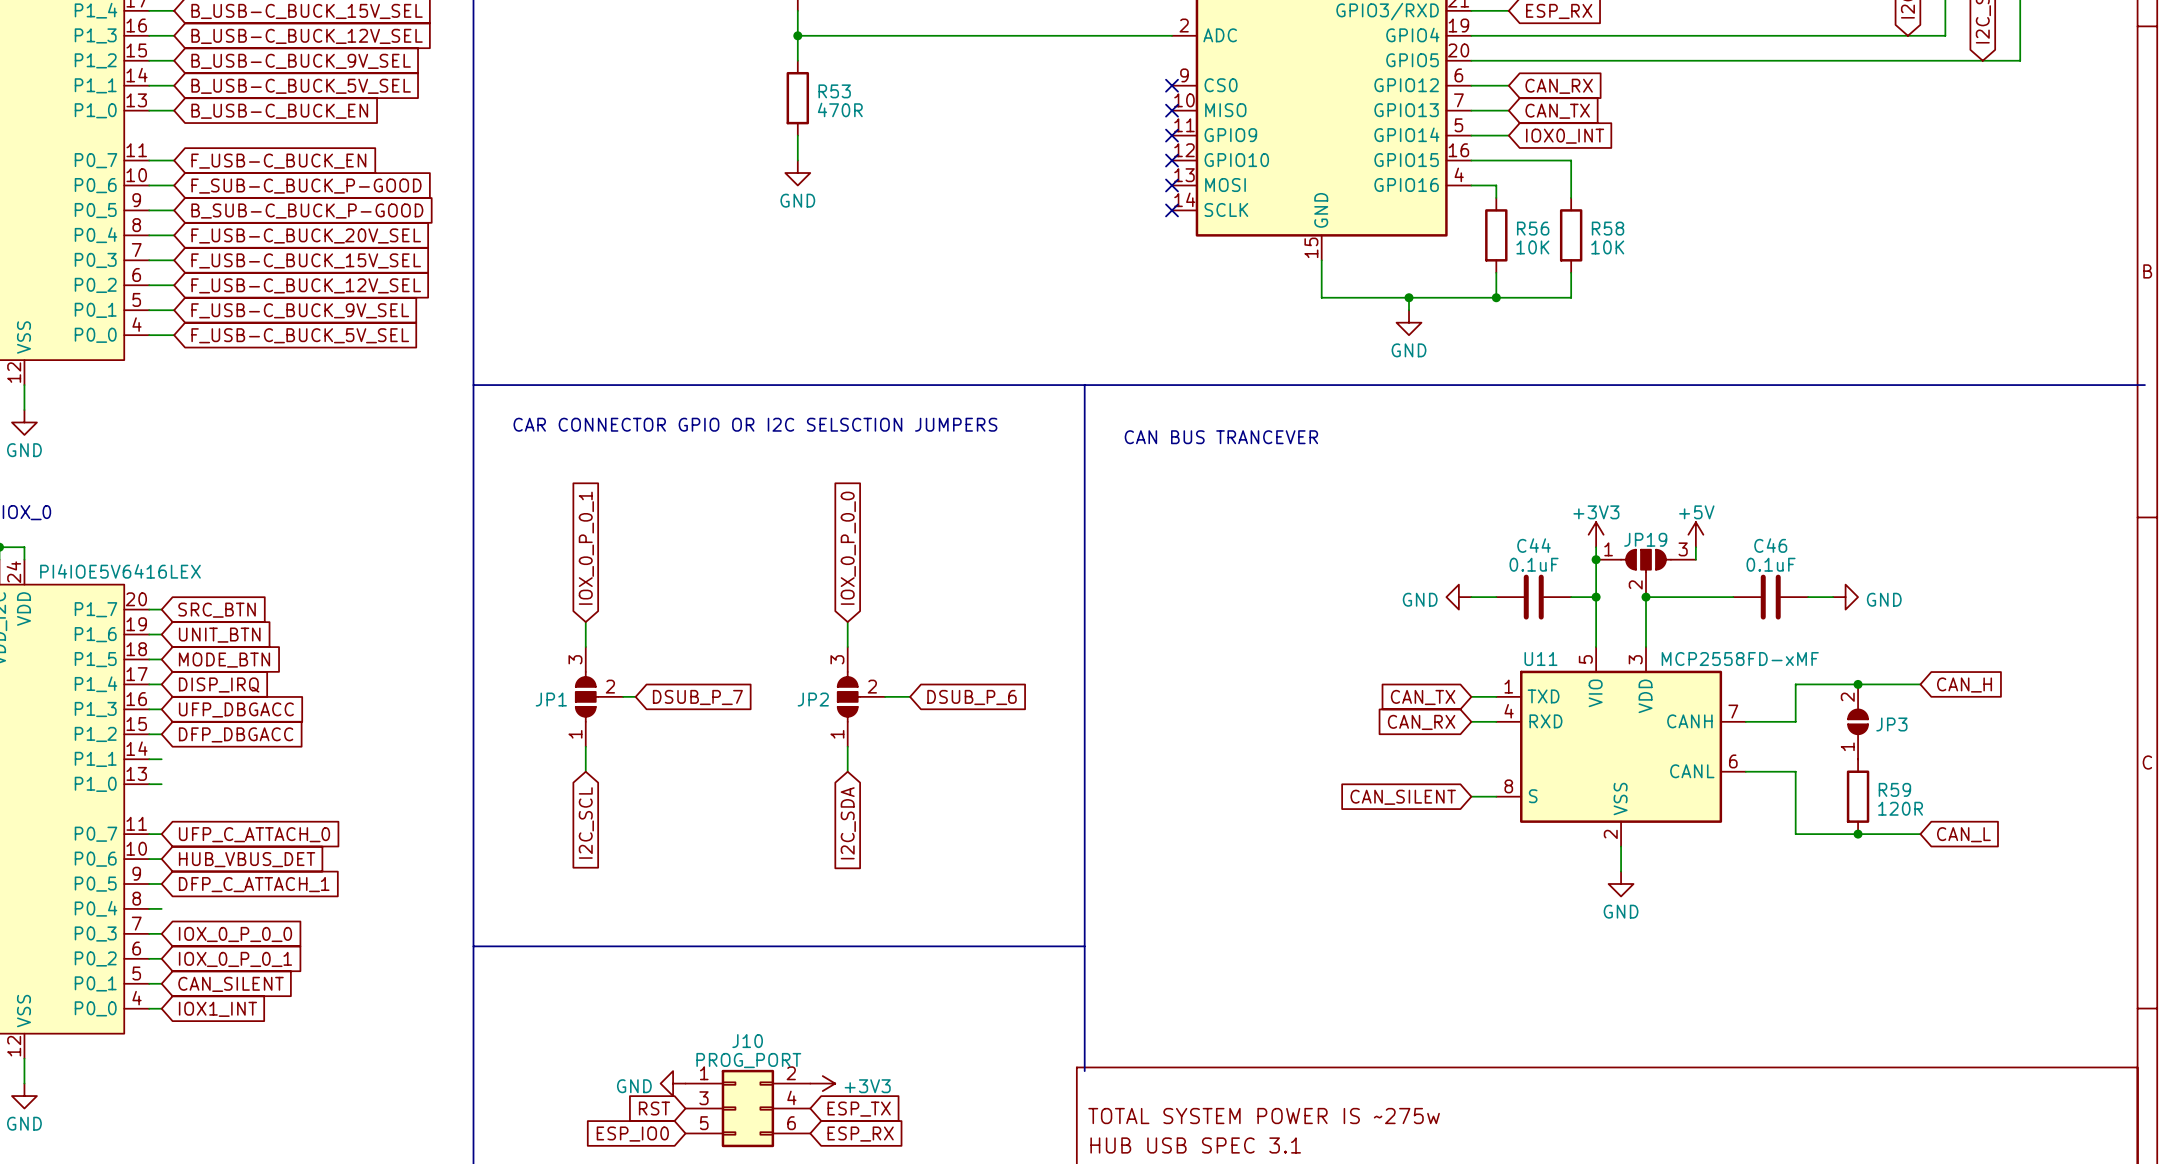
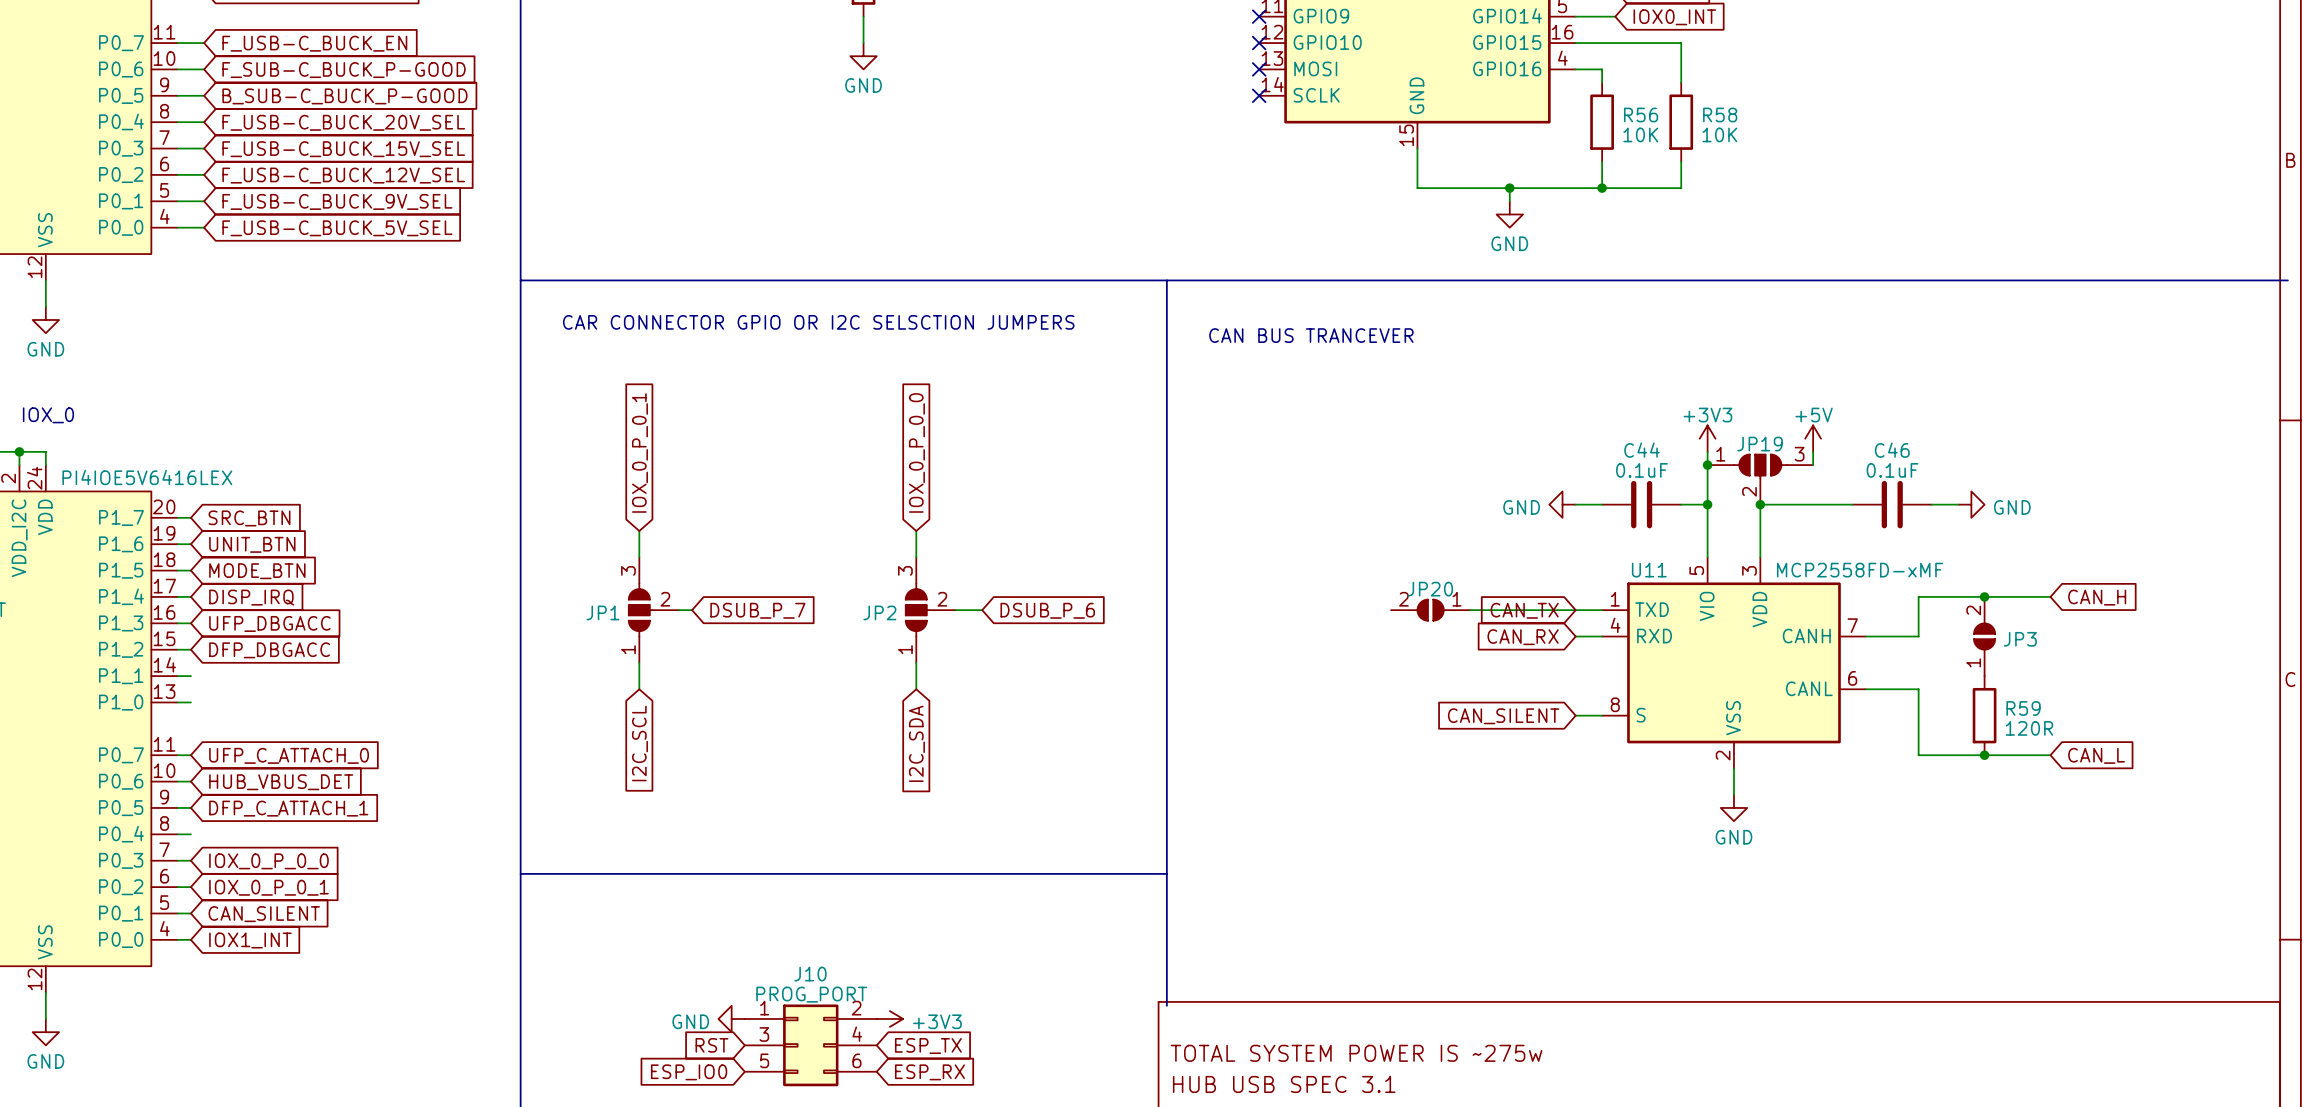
JP20: none -> (1430, 610)
wire: none -> (1470, 610) (1575, 610)

